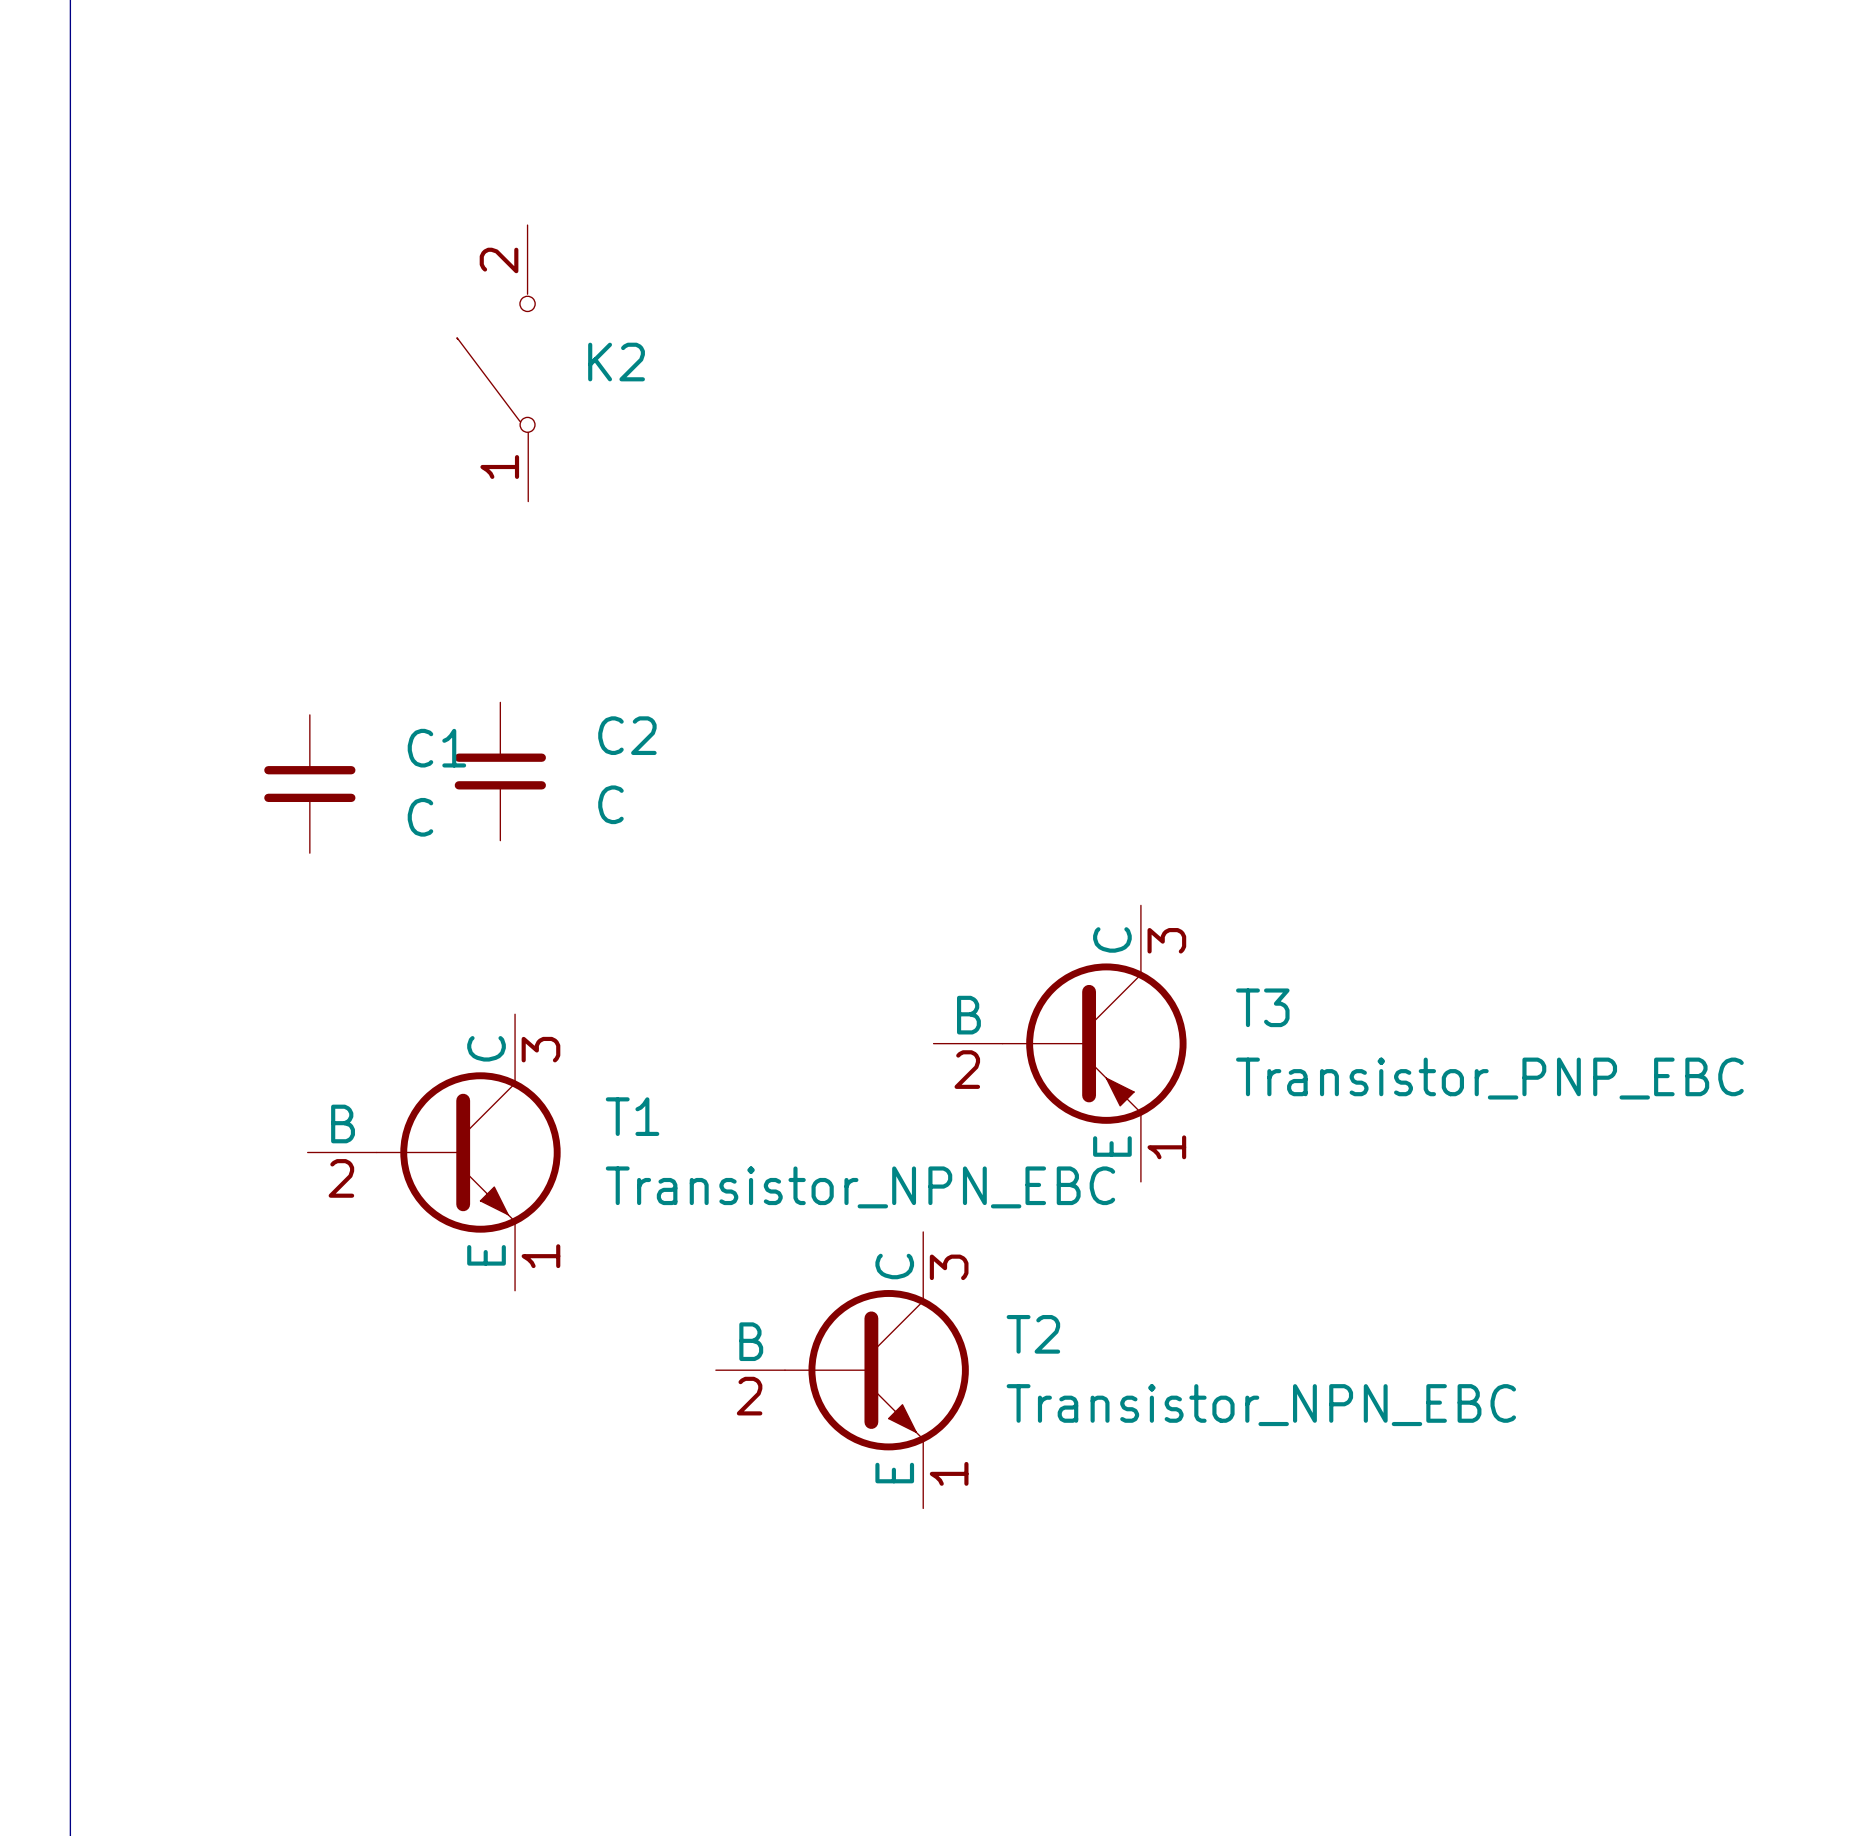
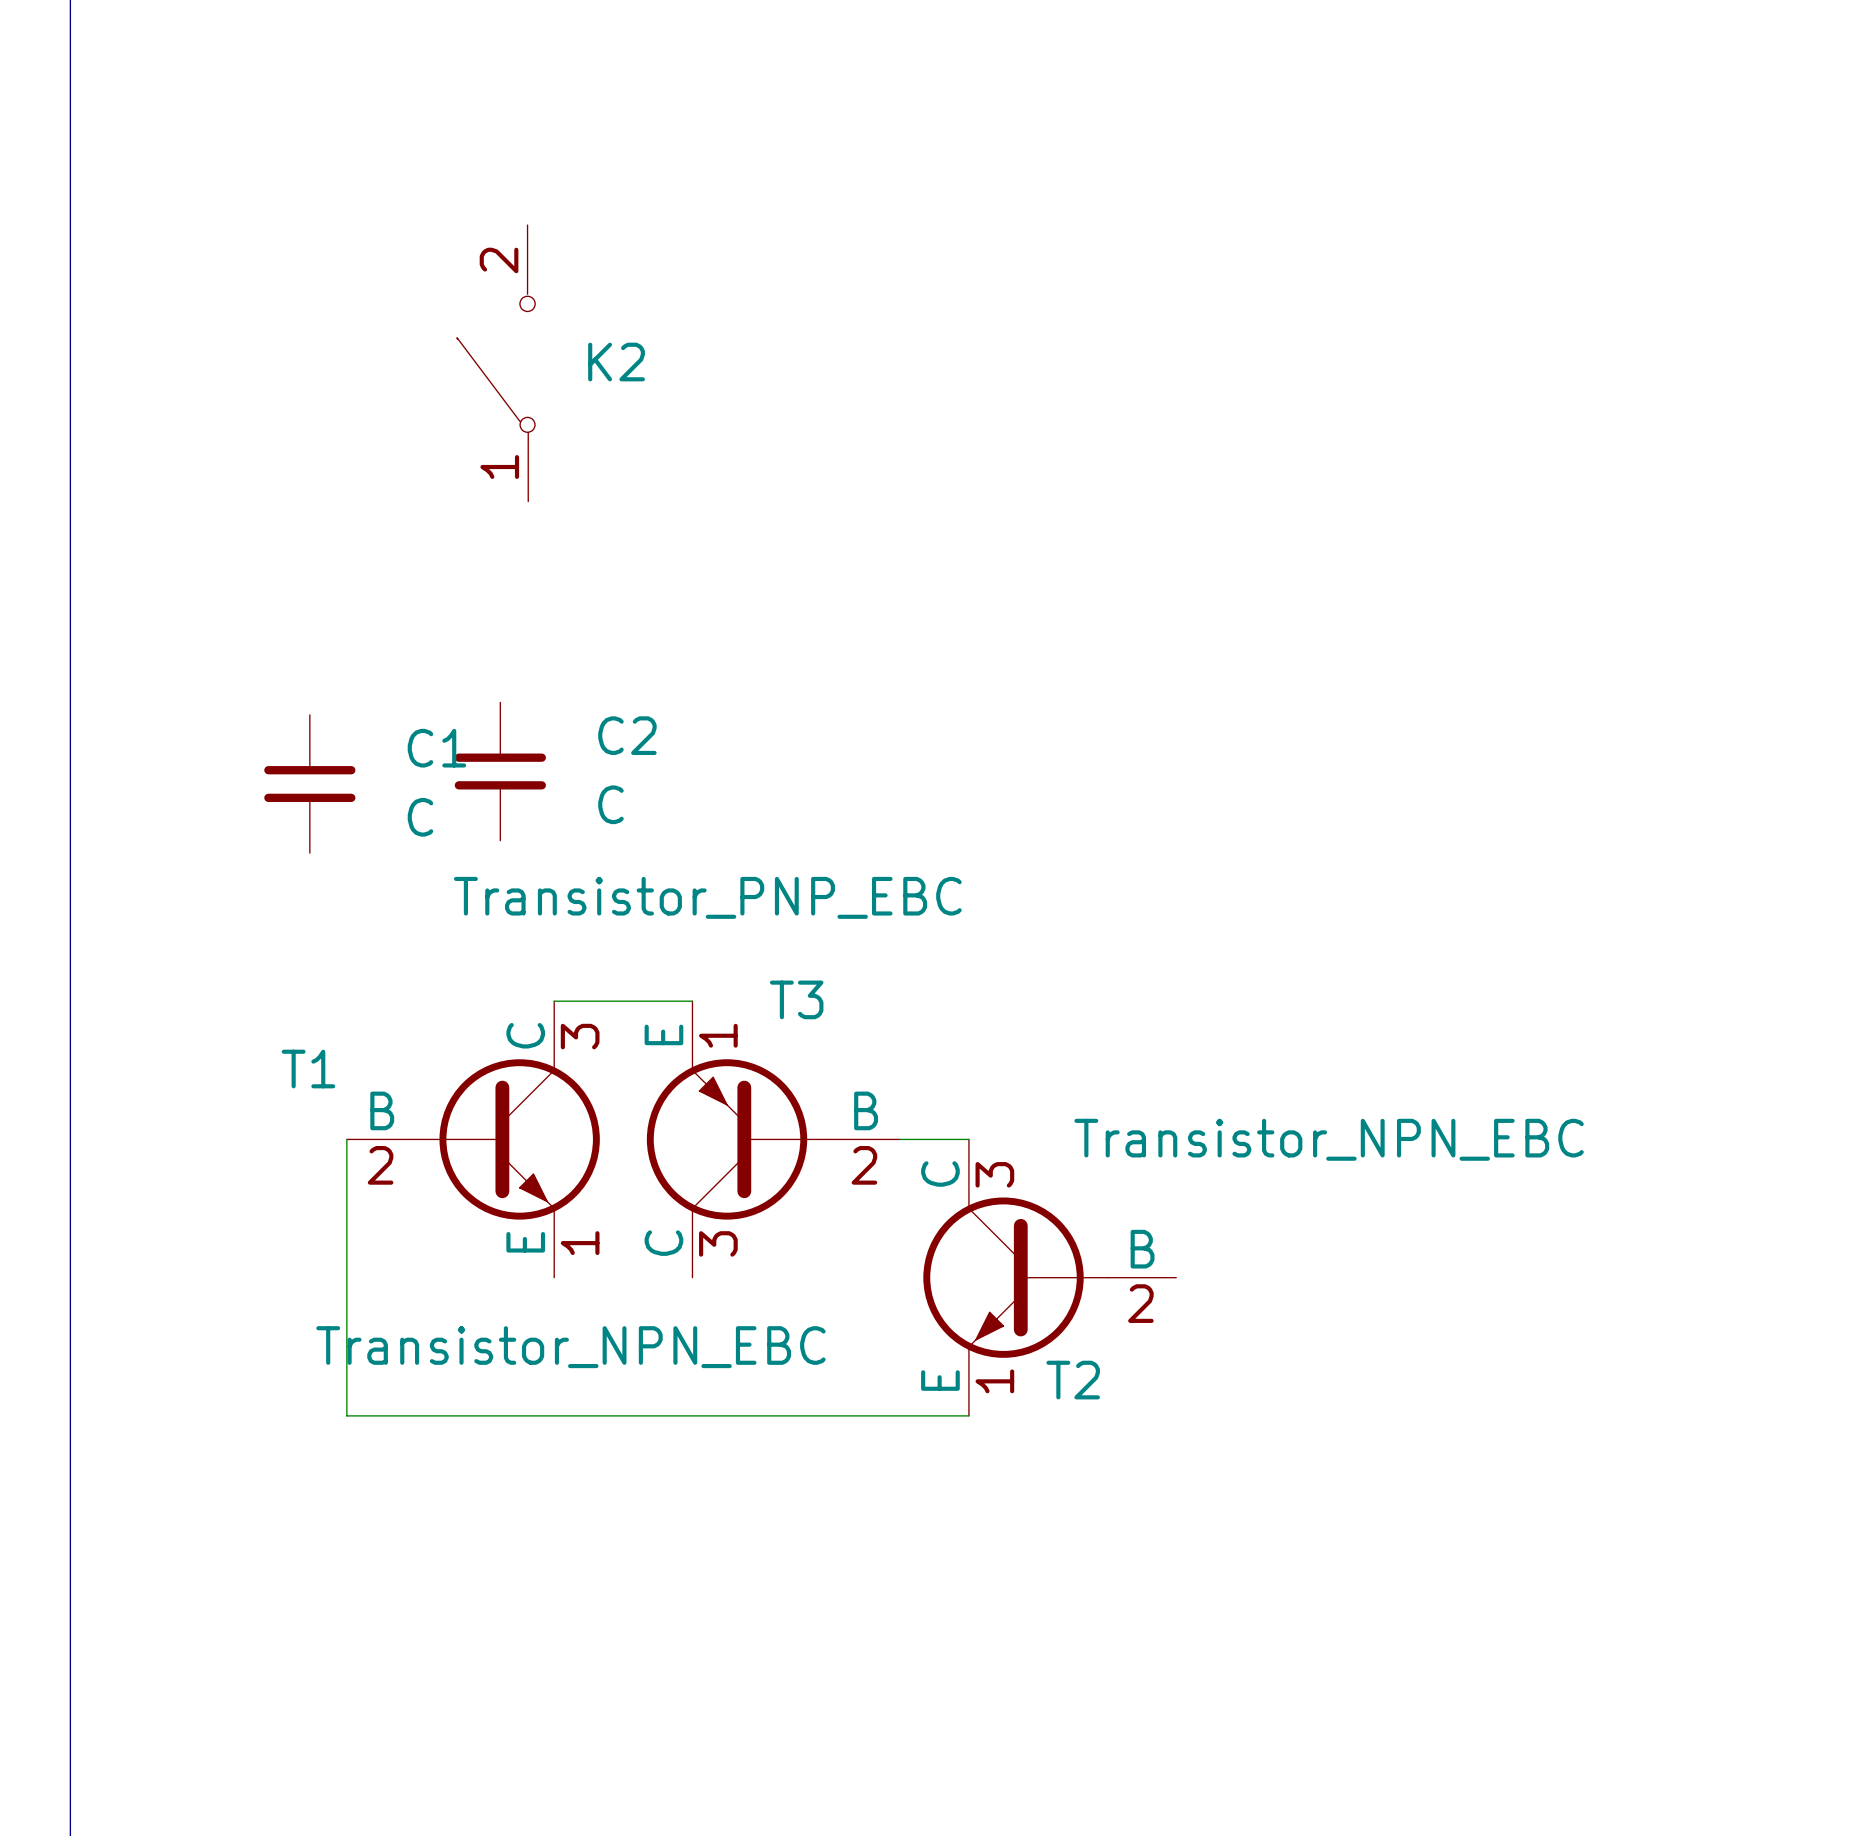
wire: none -> (554, 1001) (692, 1001)
T3 name position: T3 (1262, 1007) -> T3 (796, 999)
T3 position: (1060, 1043) -> (773, 1139)
T3 rotation: 0° (1094, 1043) -> 180° (738, 1139)
T3 value position: Transistor_PNP_EBC (1489, 1078) -> Transistor_PNP_EBC (707, 897)
T1 name position: T1 (632, 1116) -> T1 (308, 1069)
wire: none -> (346, 1139) (346, 1415) (968, 1415)
wire: none -> (899, 1139) (968, 1139)
T1 position: (434, 1152) -> (473, 1139)
T1 value position: Transistor_NPN_EBC (860, 1187) -> Transistor_NPN_EBC (570, 1347)
T2 name position: T2 (1033, 1334) -> T2 (1073, 1380)
T2 position: (842, 1370) -> (1049, 1277)
T2 flip: as is (876, 1370) -> left-right (1015, 1277)
T2 value position: Transistor_NPN_EBC (1261, 1405) -> Transistor_NPN_EBC (1329, 1139)

